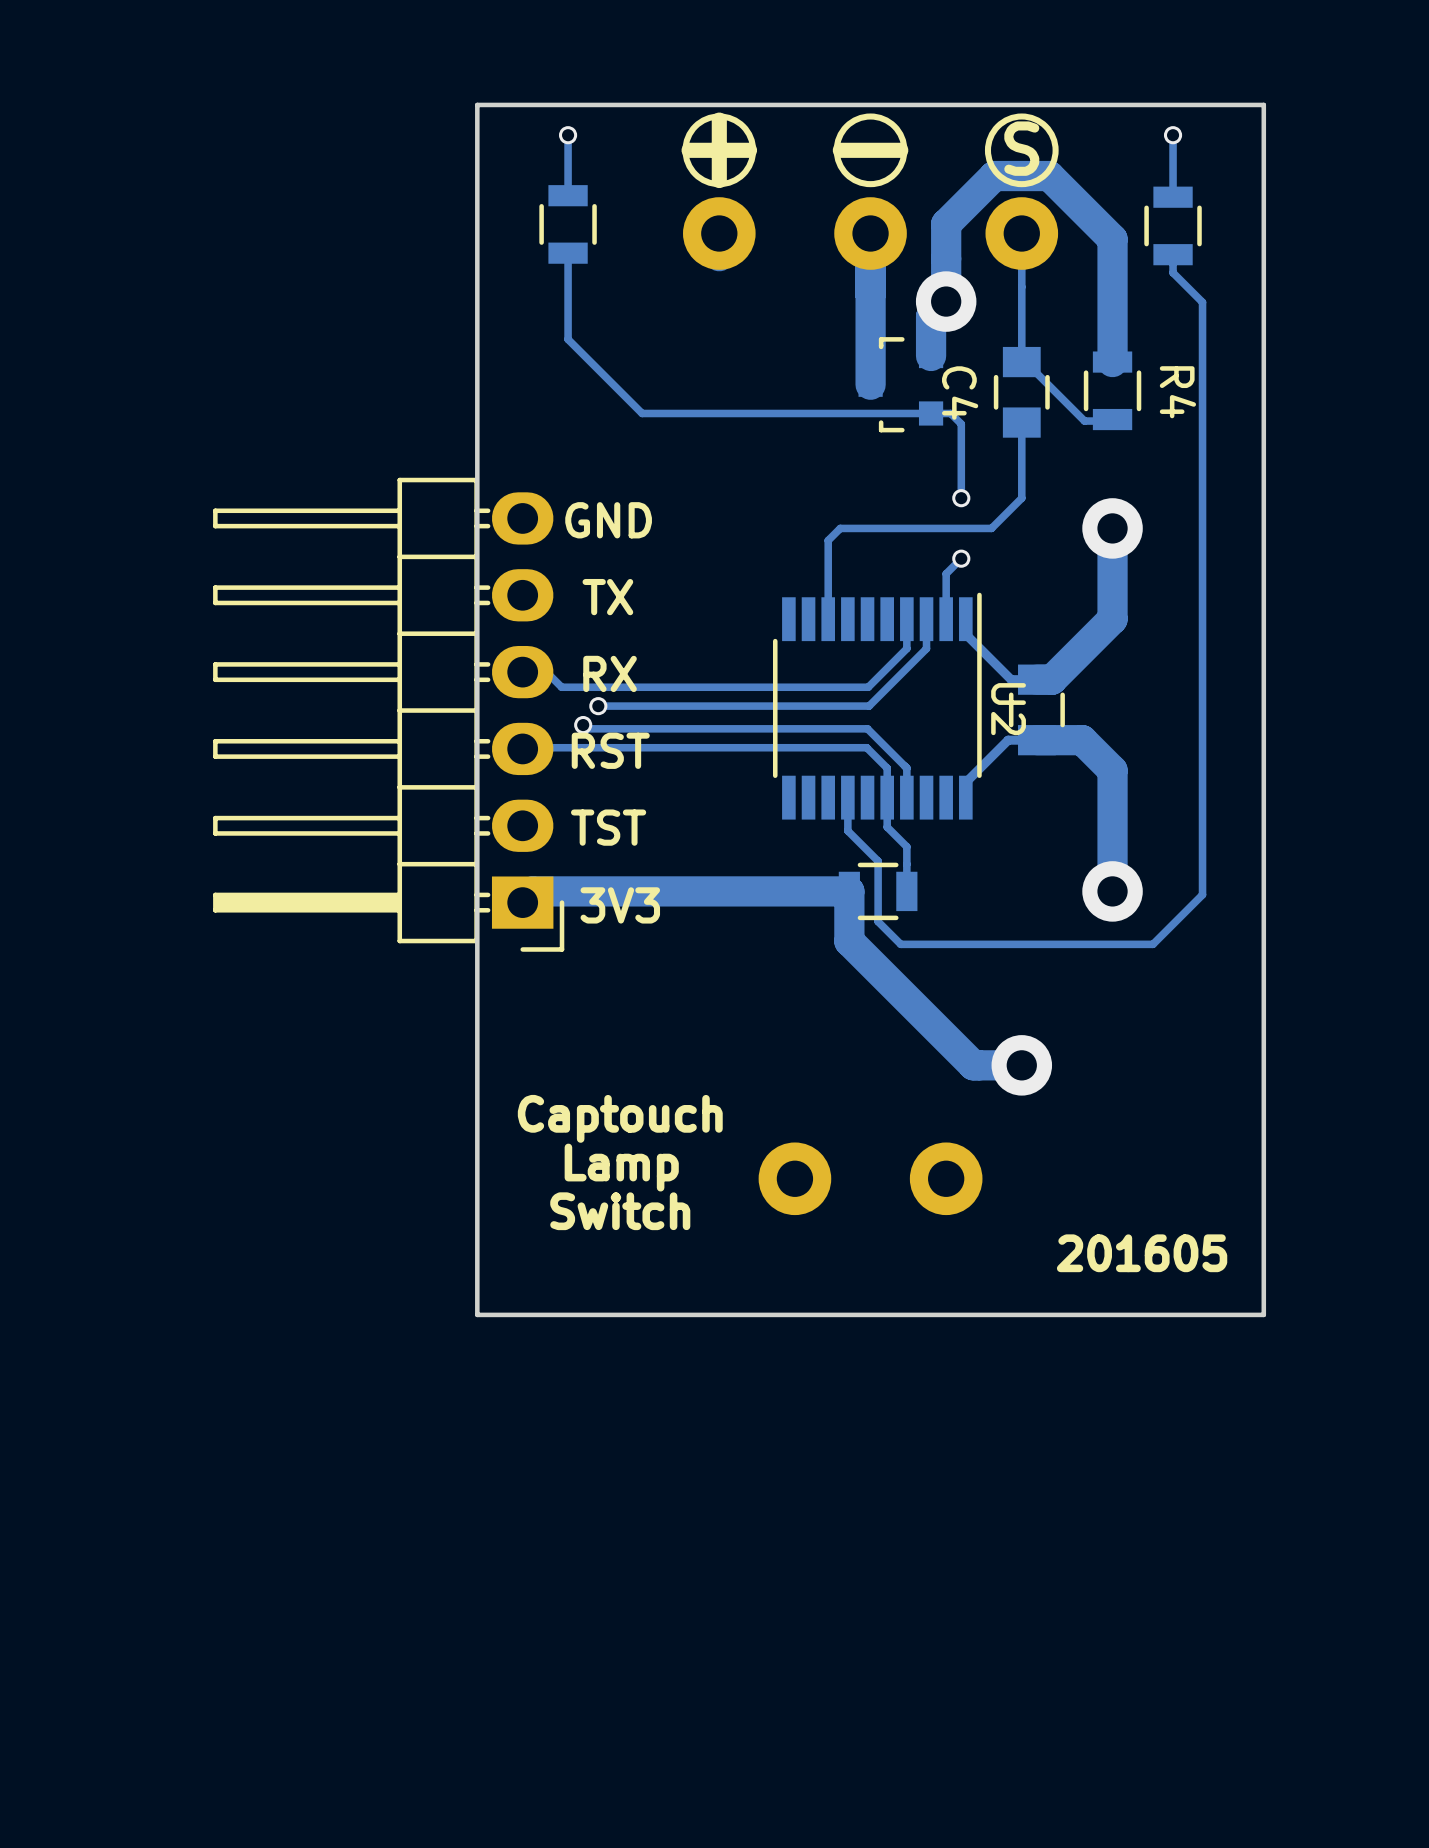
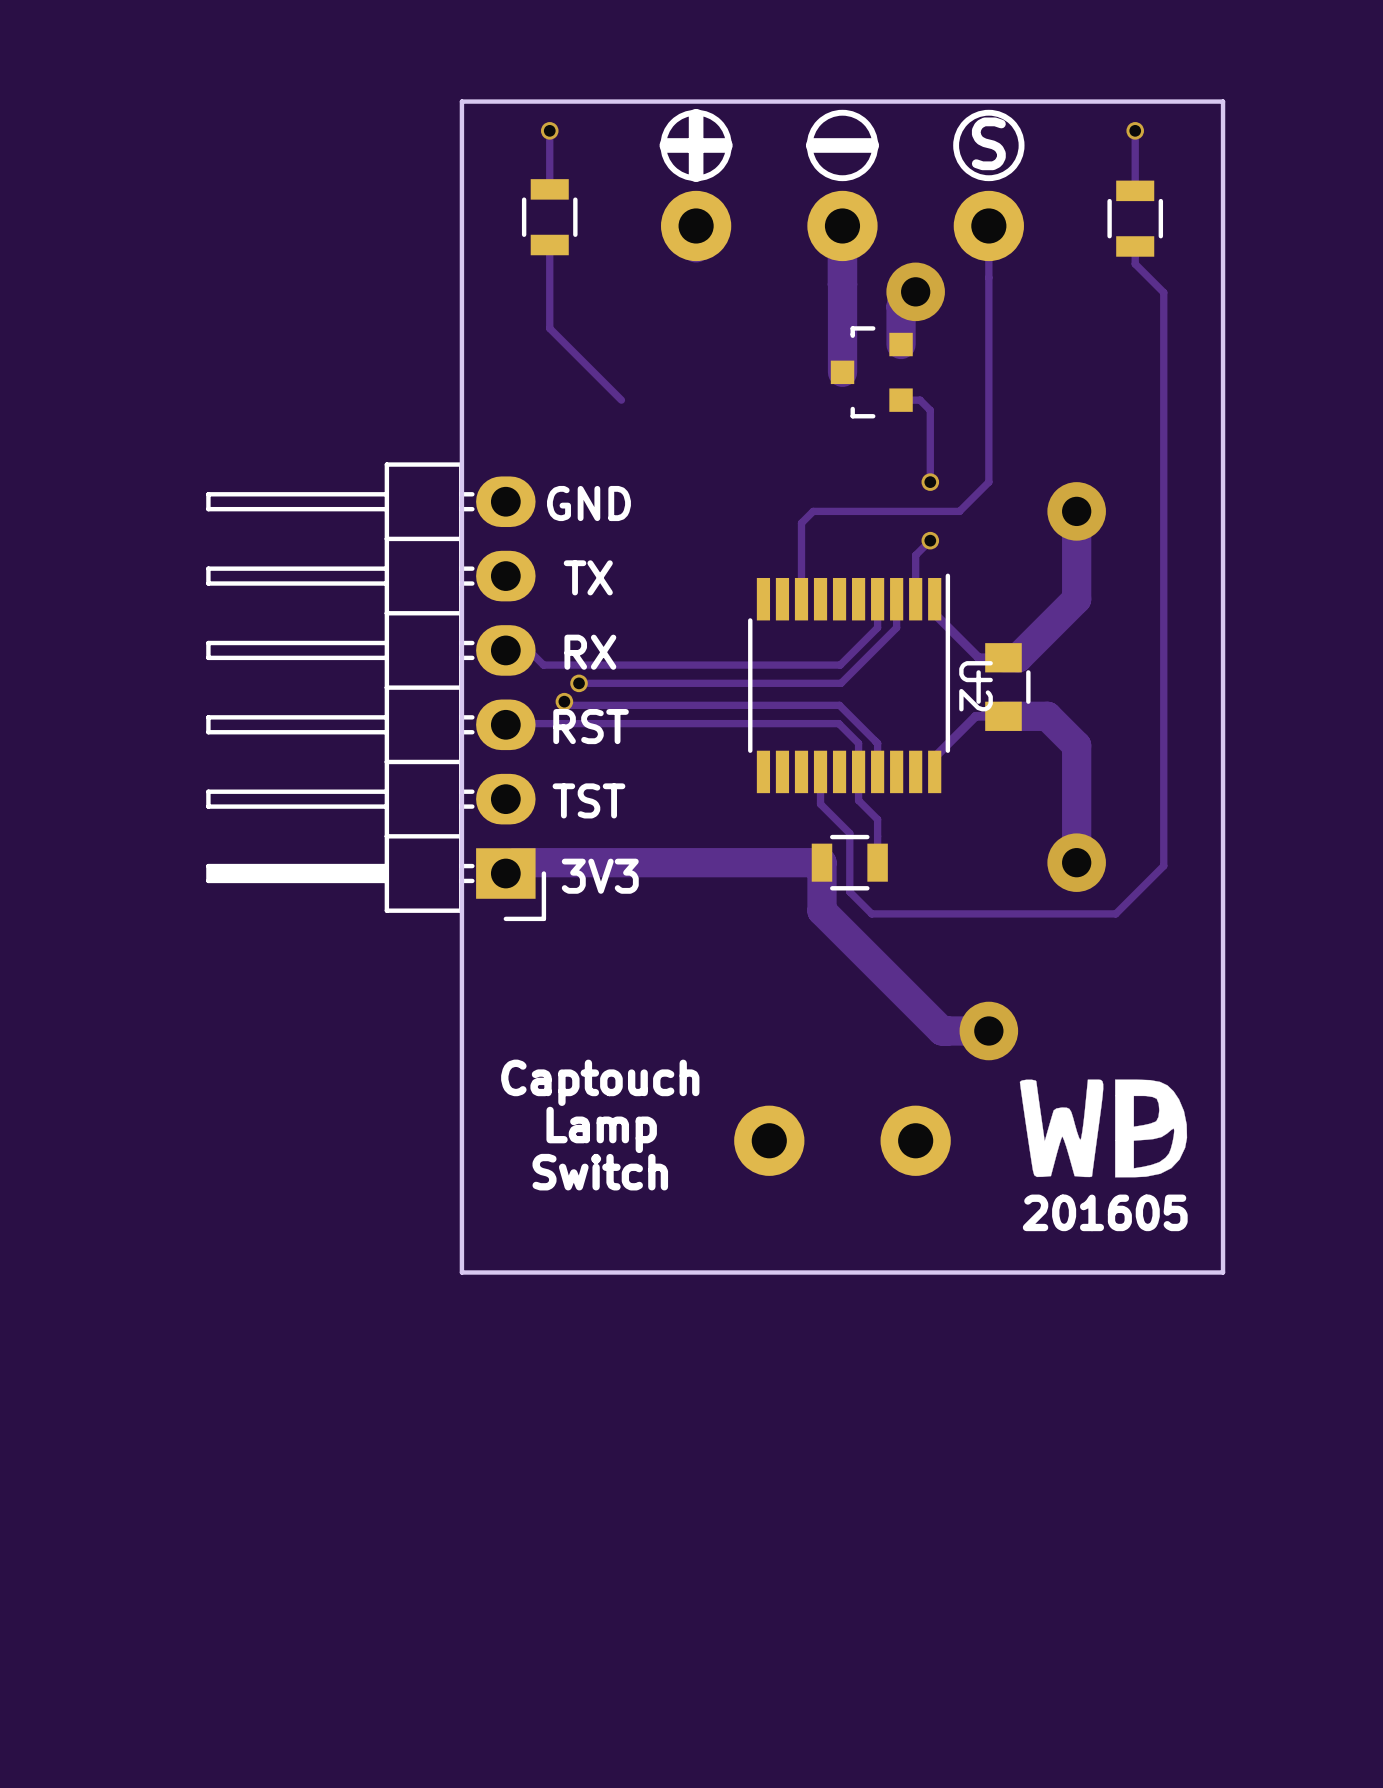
track: (946, 301) (946, 224) (994, 176) (1049, 176) (1112, 239) (1112, 362) -> none
track: (1021, 362) (1025, 362) (1084, 421) (1112, 421) -> (988, 350) (988, 408)
R4: (1112, 390) -> none
C4: (1021, 392) -> none
track: (931, 413) (642, 413) -> none
drawing: none -> [1019, 1079, 1188, 1178]

